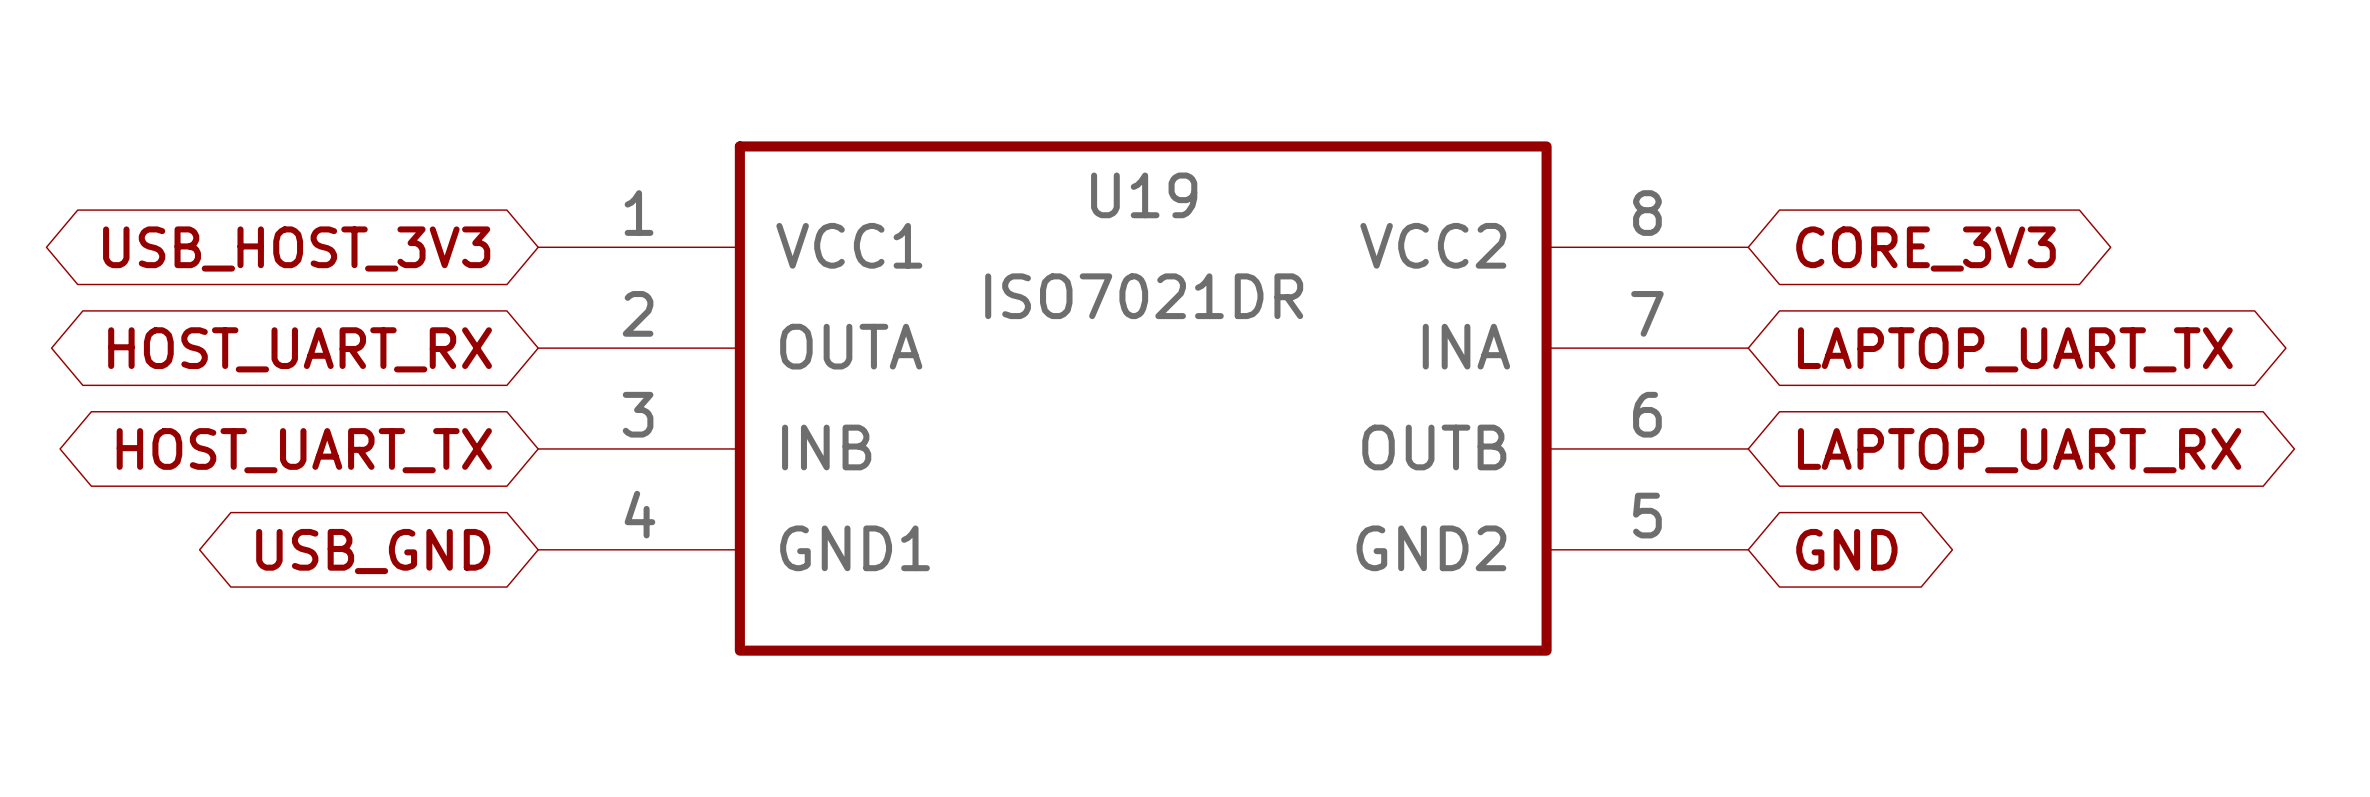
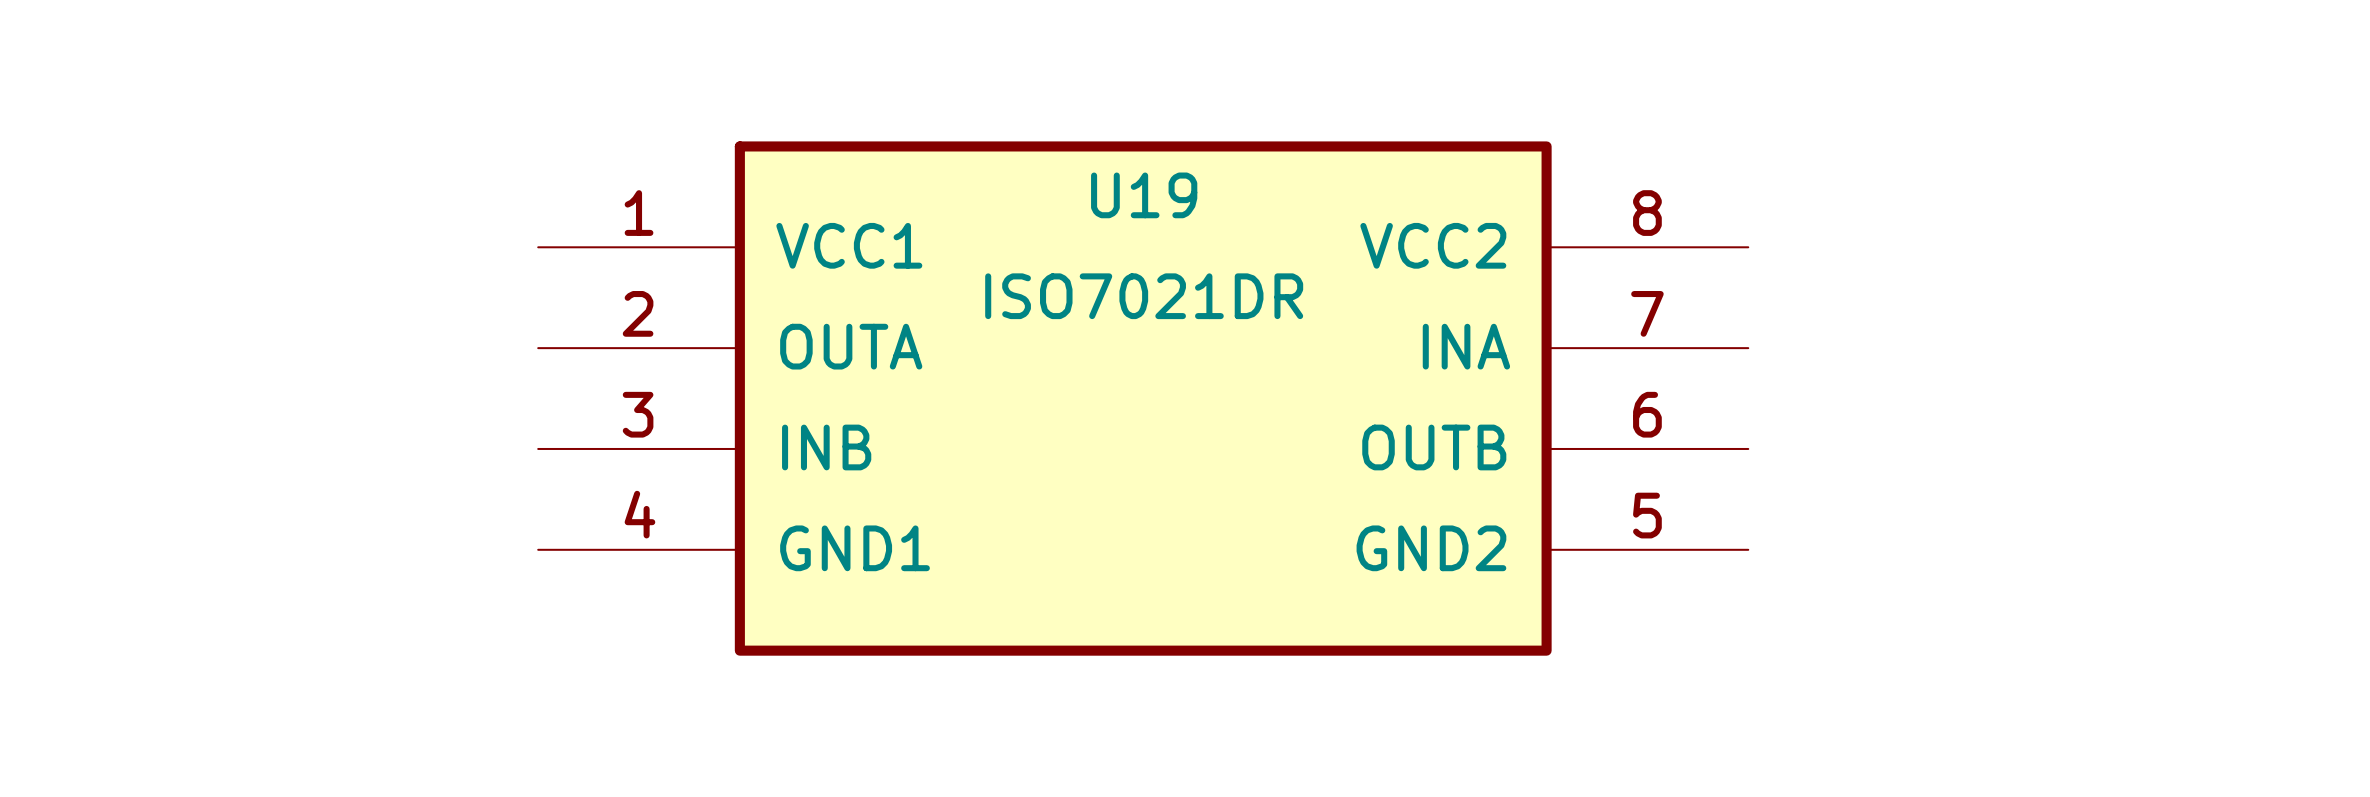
global label: USB_HOST_3V3 (296, 248) -> none
global label: CORE_3V3 (1926, 248) -> none
global label: HOST_UART_RX (300, 349) -> none
global label: LAPTOP_UART_TX (2015, 349) -> none
global label: HOST_UART_TX (304, 450) -> none
global label: LAPTOP_UART_RX (2019, 450) -> none
global label: GND (1846, 549) -> none
global label: USB_GND (373, 551) -> none

